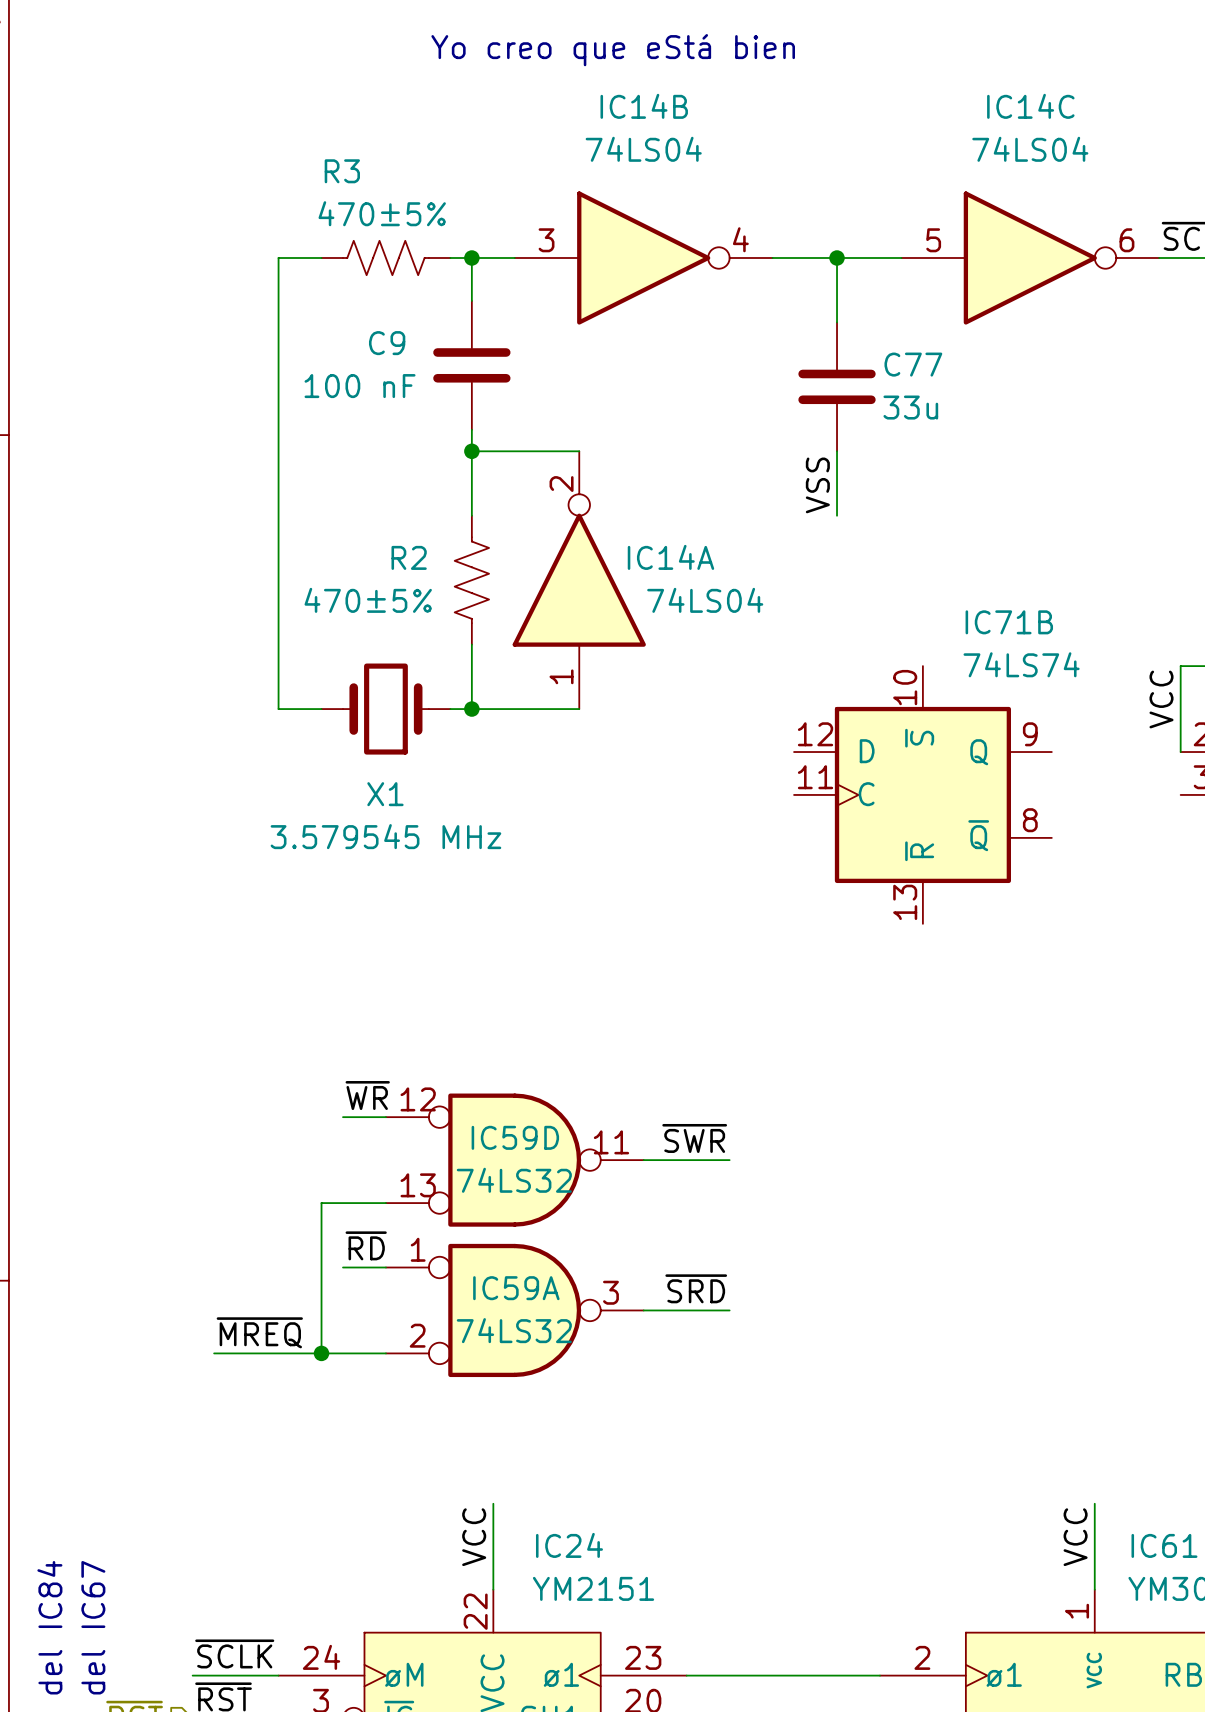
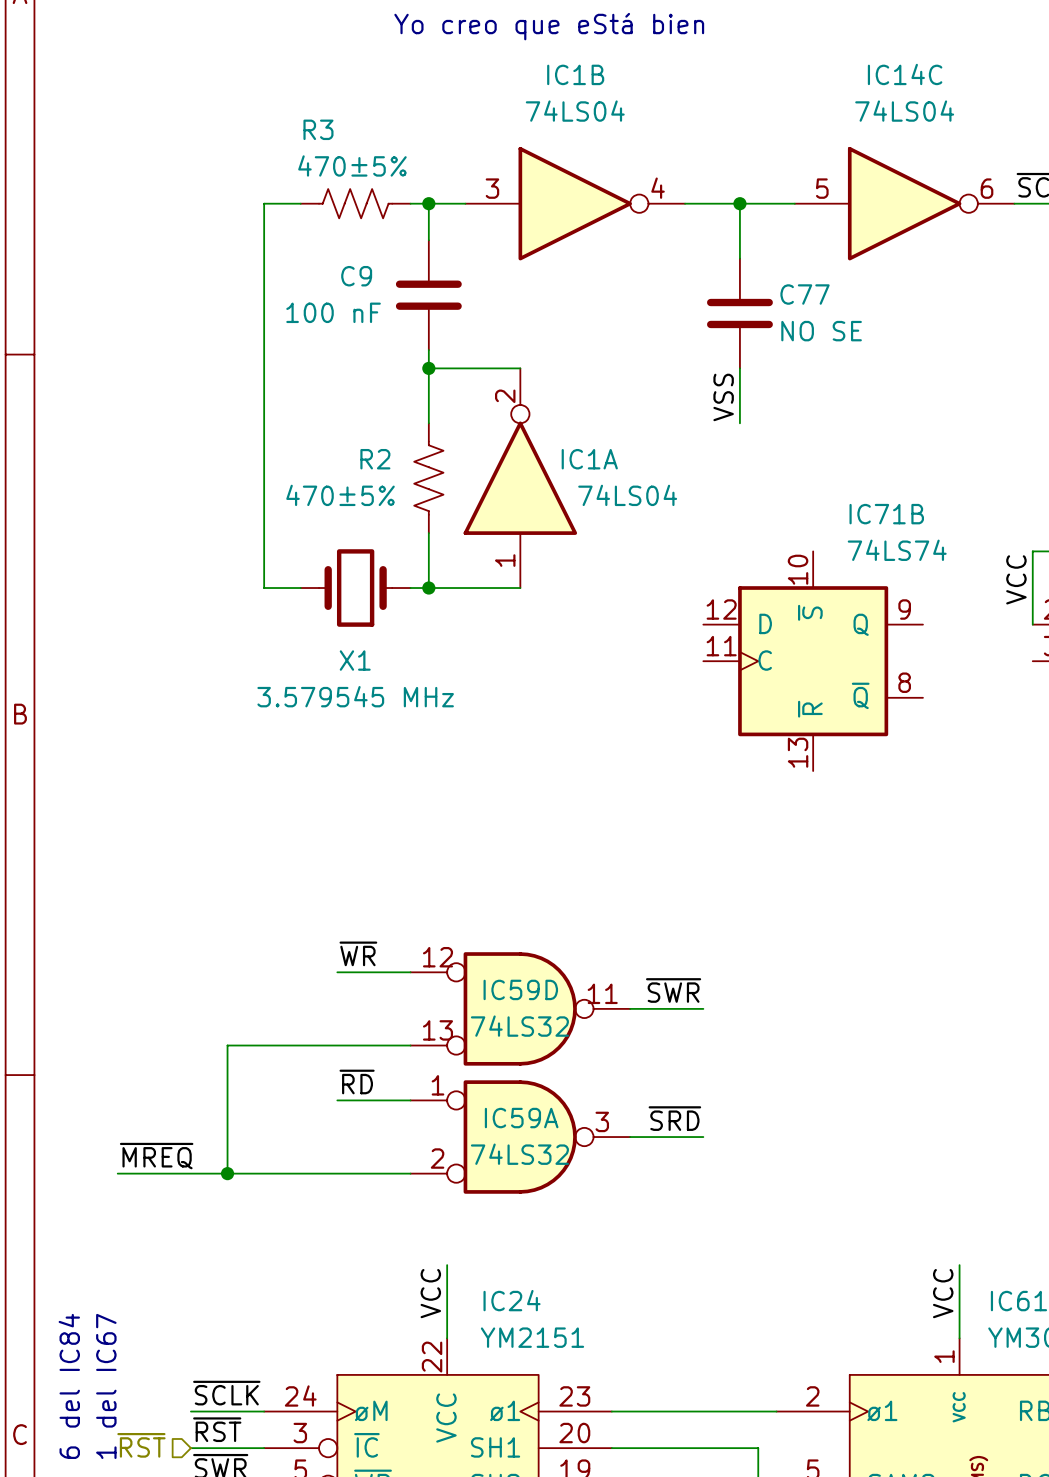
IC14B name: IC14B (644, 106) -> IC1B (575, 74)
C77 value: 33u (910, 407) -> NO SE (821, 331)
IC14A name: IC14A (670, 557) -> IC1A (589, 459)
label position: ~{WR} (367, 1095) -> ~{WR} (358, 953)
wire: (343, 1117) (385, 1117) -> none
label position: ~{SWR} (694, 1138) -> ~{SWR} (673, 990)
wire: none -> (337, 972) (410, 972)
IC59D position: (514, 1160) -> (520, 1008)
wire: (643, 1160) (729, 1160) -> (630, 1008) (703, 1008)
wire: (385, 1203) (321, 1203) (321, 1353) -> none
label position: ~{RD} (366, 1245) -> ~{RD} (357, 1081)
wire: none -> (410, 1045) (227, 1045) (227, 1173)
wire: (343, 1267) (385, 1267) -> none
label position: ~{SRD} (696, 1288) -> ~{SRD} (674, 1118)
wire: none -> (337, 1100) (410, 1100)
IC59A position: (514, 1310) -> (520, 1137)
wire: (643, 1310) (729, 1310) -> (630, 1137) (703, 1137)
label position: ~{MREQ} (259, 1332) -> ~{MREQ} (156, 1156)
wire: (214, 1353) (385, 1353) -> none
junction position: (321, 1353) -> (227, 1173)
wire: none -> (117, 1173) (410, 1173)

